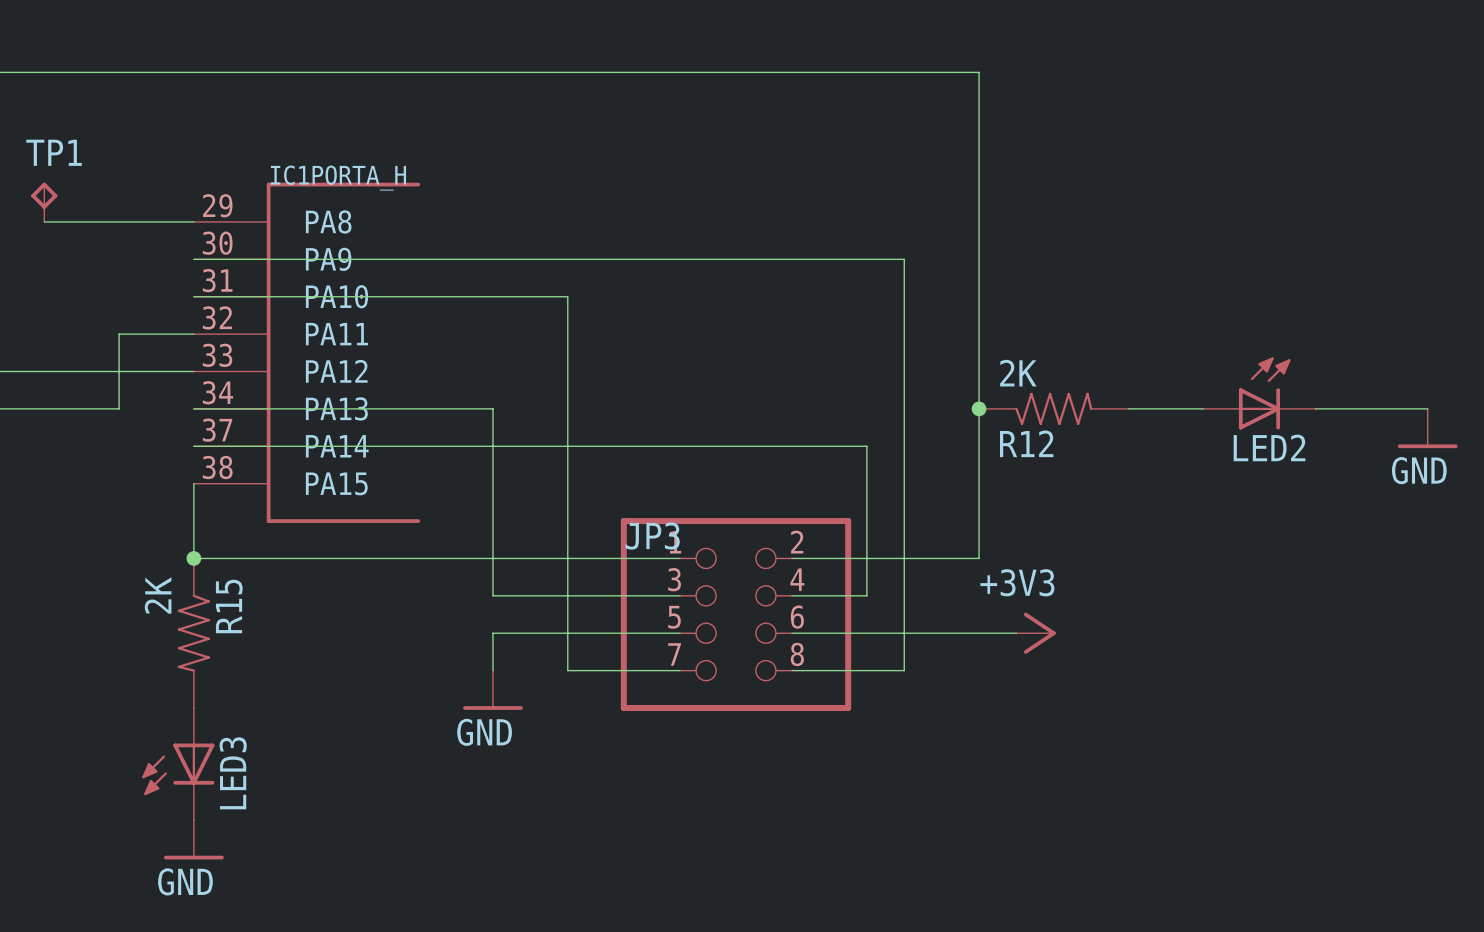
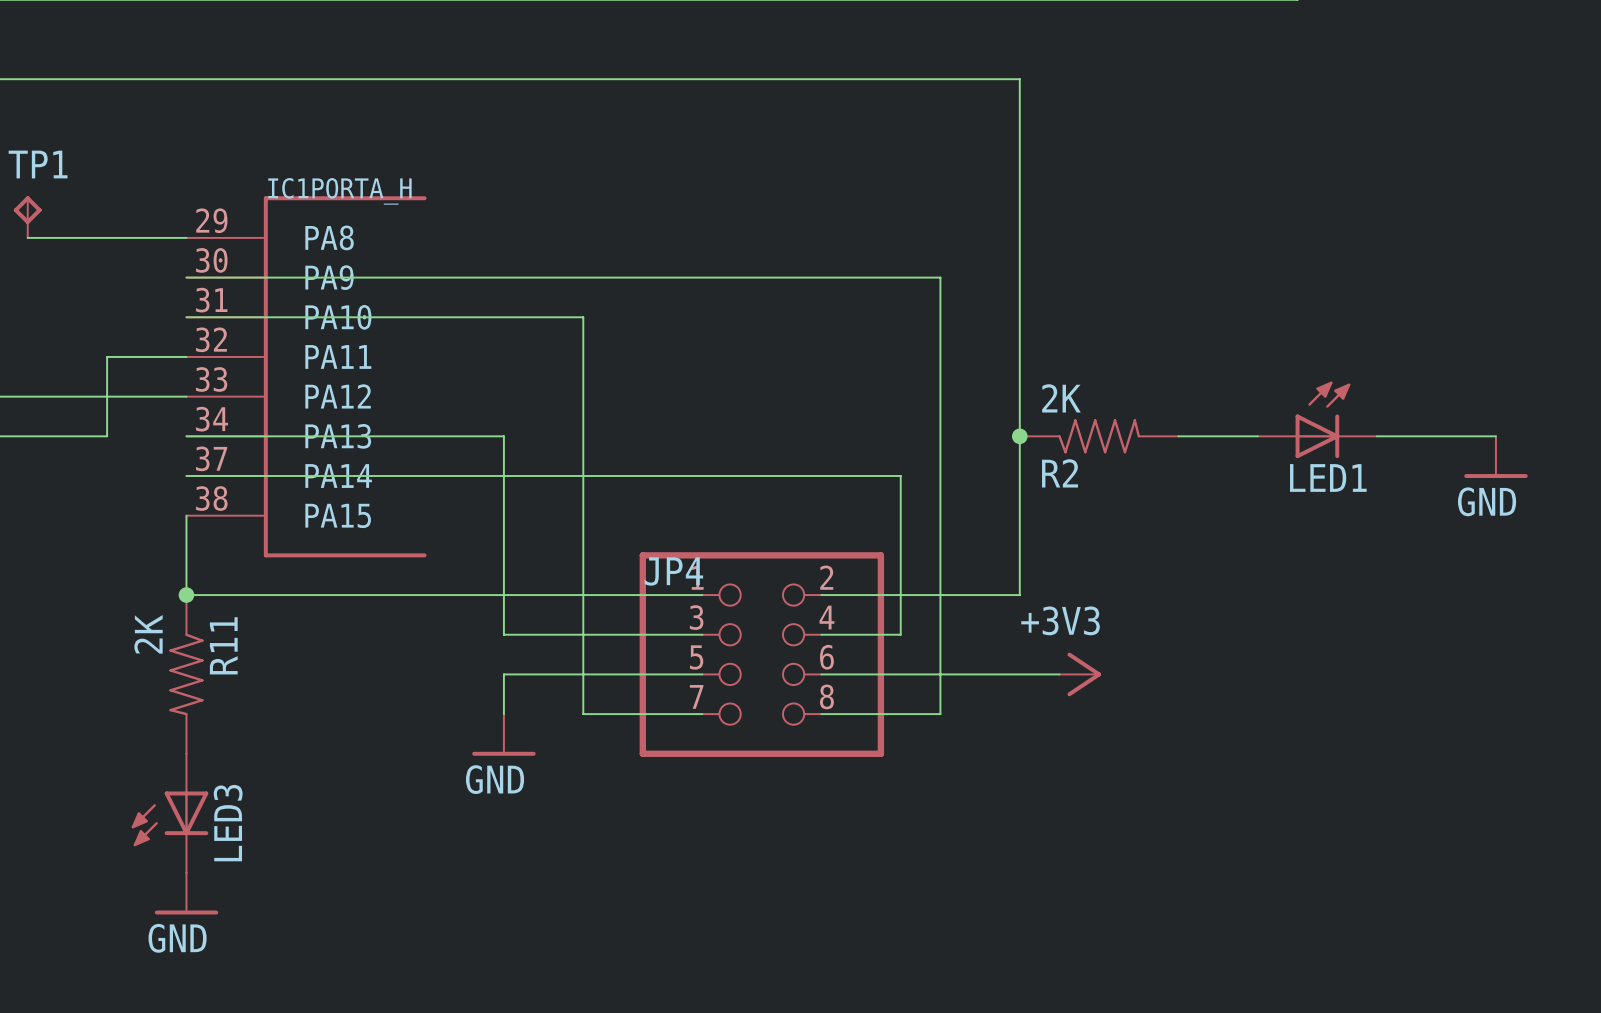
R12 name: R12 (1026, 443) -> R2 (1060, 473)
LED2 name: LED2 (1269, 447) -> LED1 (1328, 477)
JP3 name: JP3 (652, 536) -> JP4 (673, 571)
R15 name: R15 (229, 606) -> R11 (223, 645)

